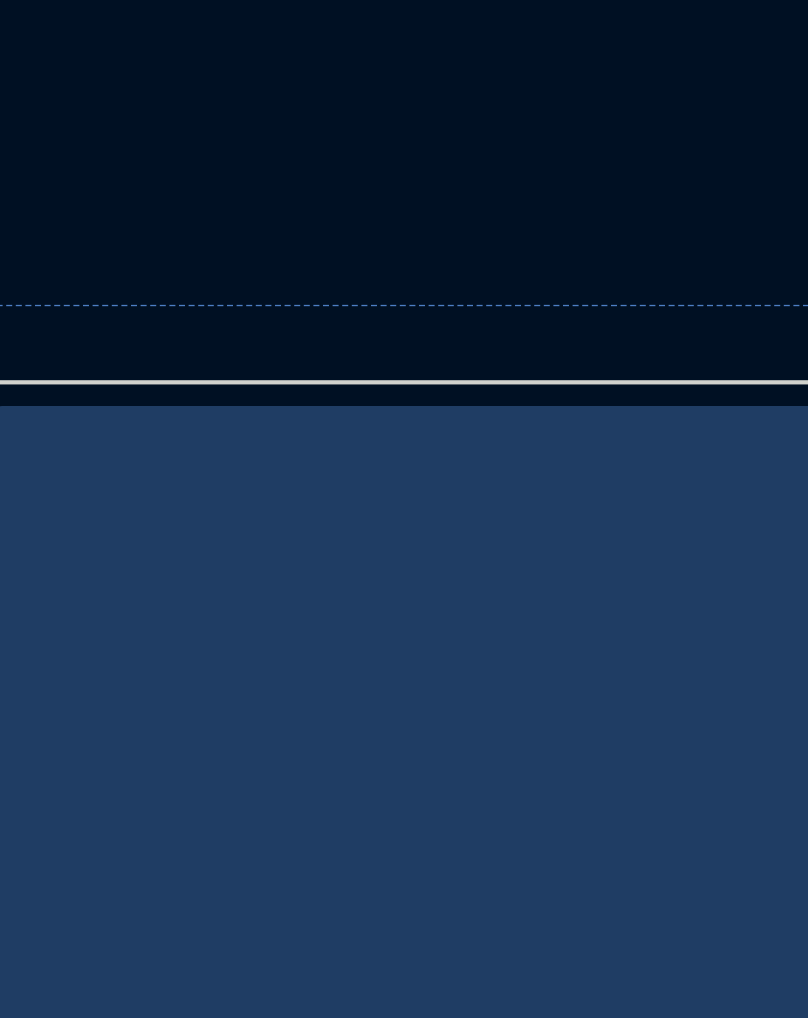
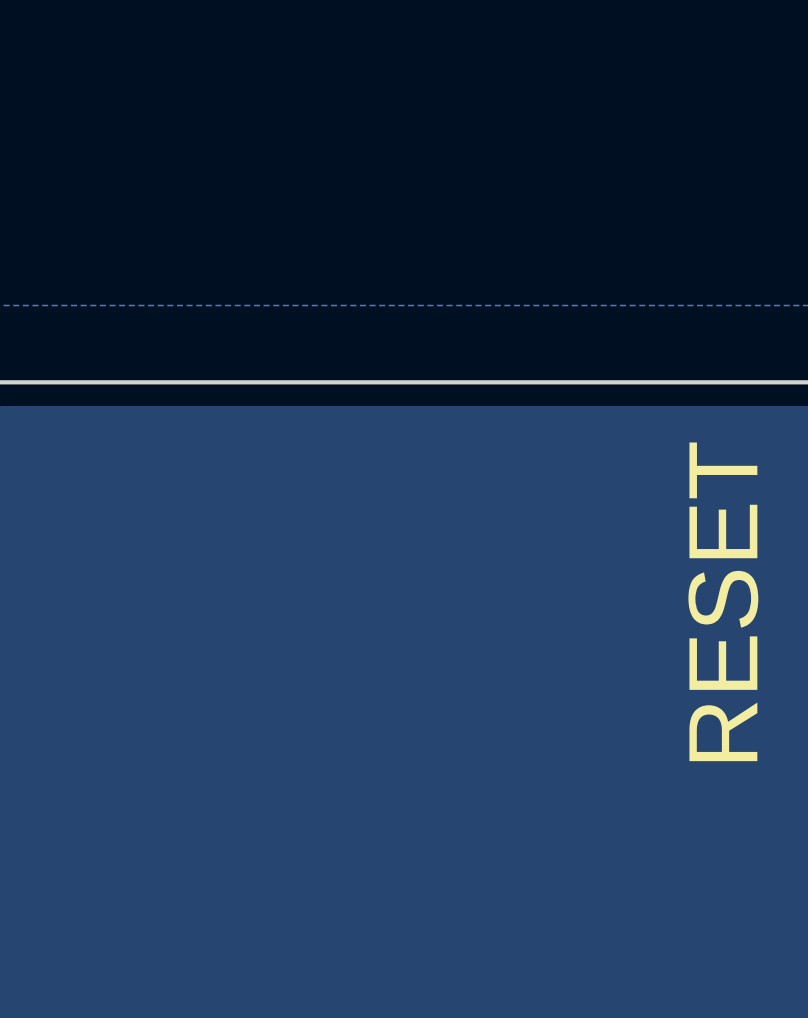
text: none -> RESET (723, 601)

